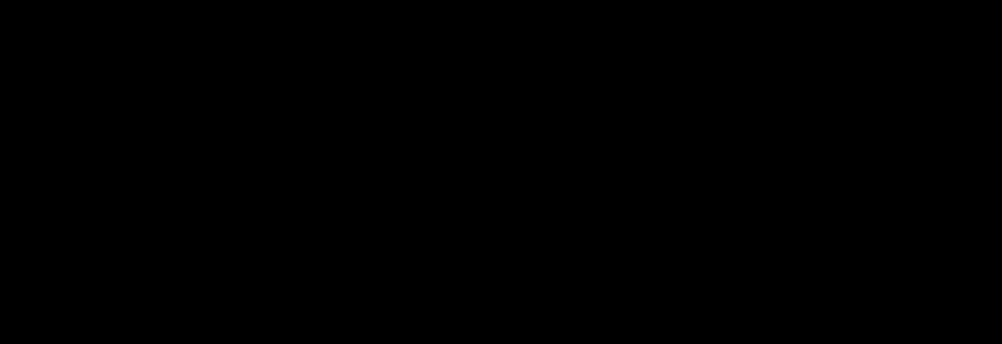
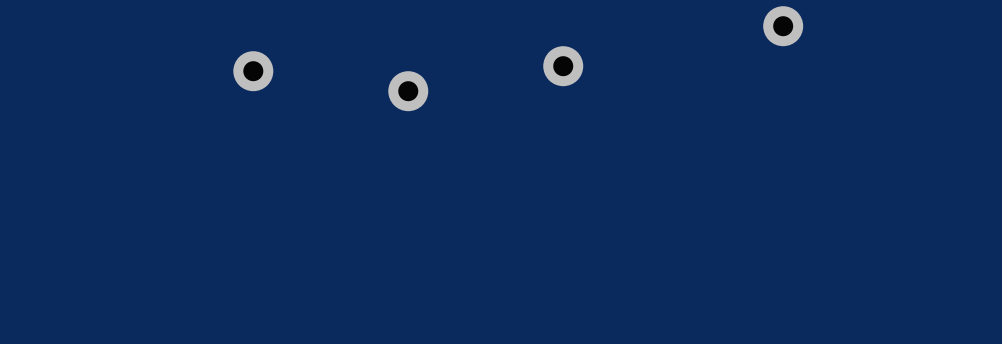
via: none -> (783, 26)
via: none -> (563, 66)
via: none -> (253, 71)
via: none -> (408, 91)

